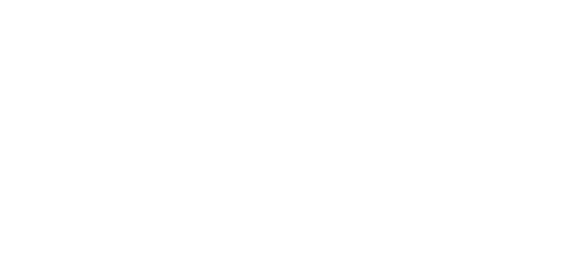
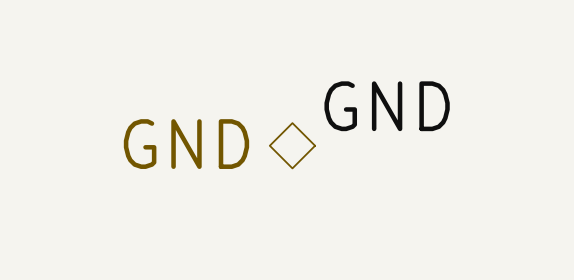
label: none -> GND (387, 106)
hierarchical label: none -> GND (186, 144)

